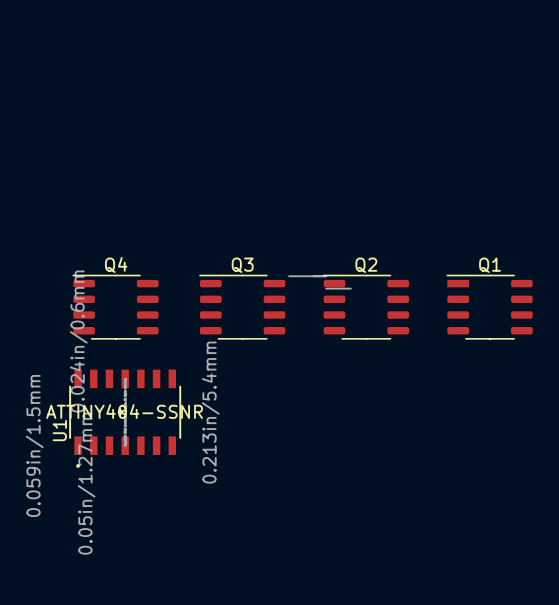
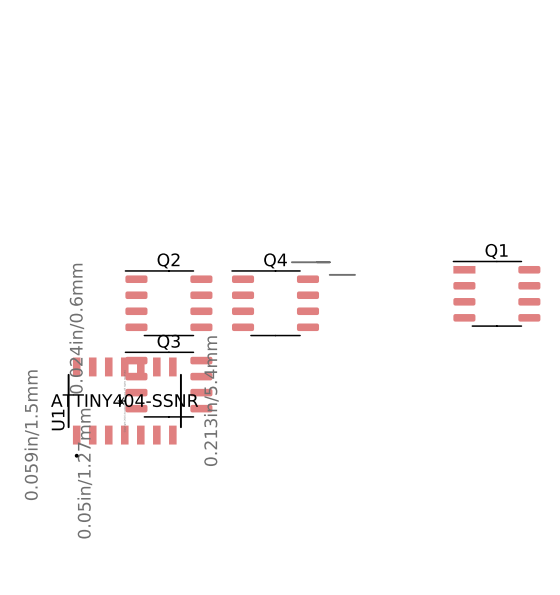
Q4 position: (115, 307) -> (275, 303)
Q3 position: (242, 307) -> (168, 384)
Q2 position: (365, 307) -> (168, 303)

